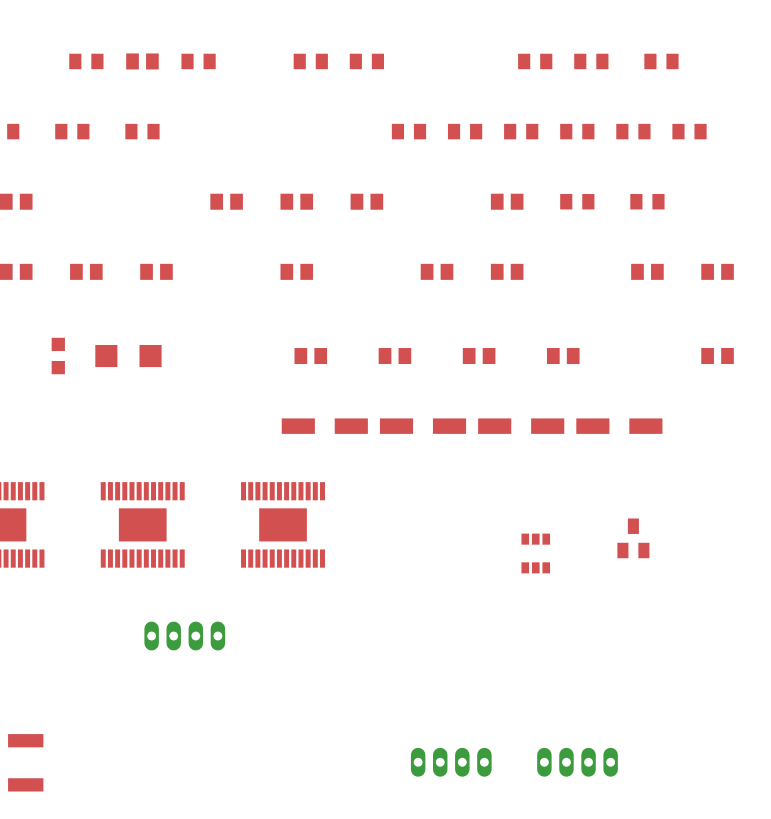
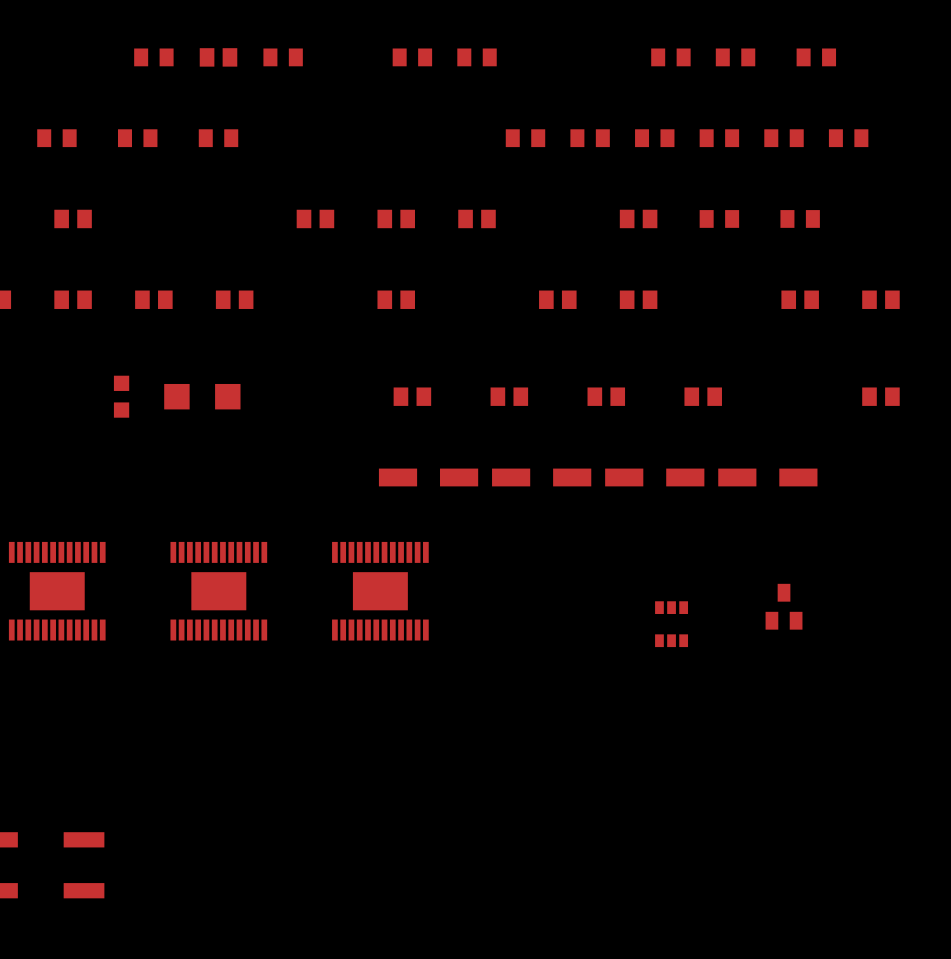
part: (184, 636) -> none
part: (451, 762) -> none
part: (577, 762) -> none

